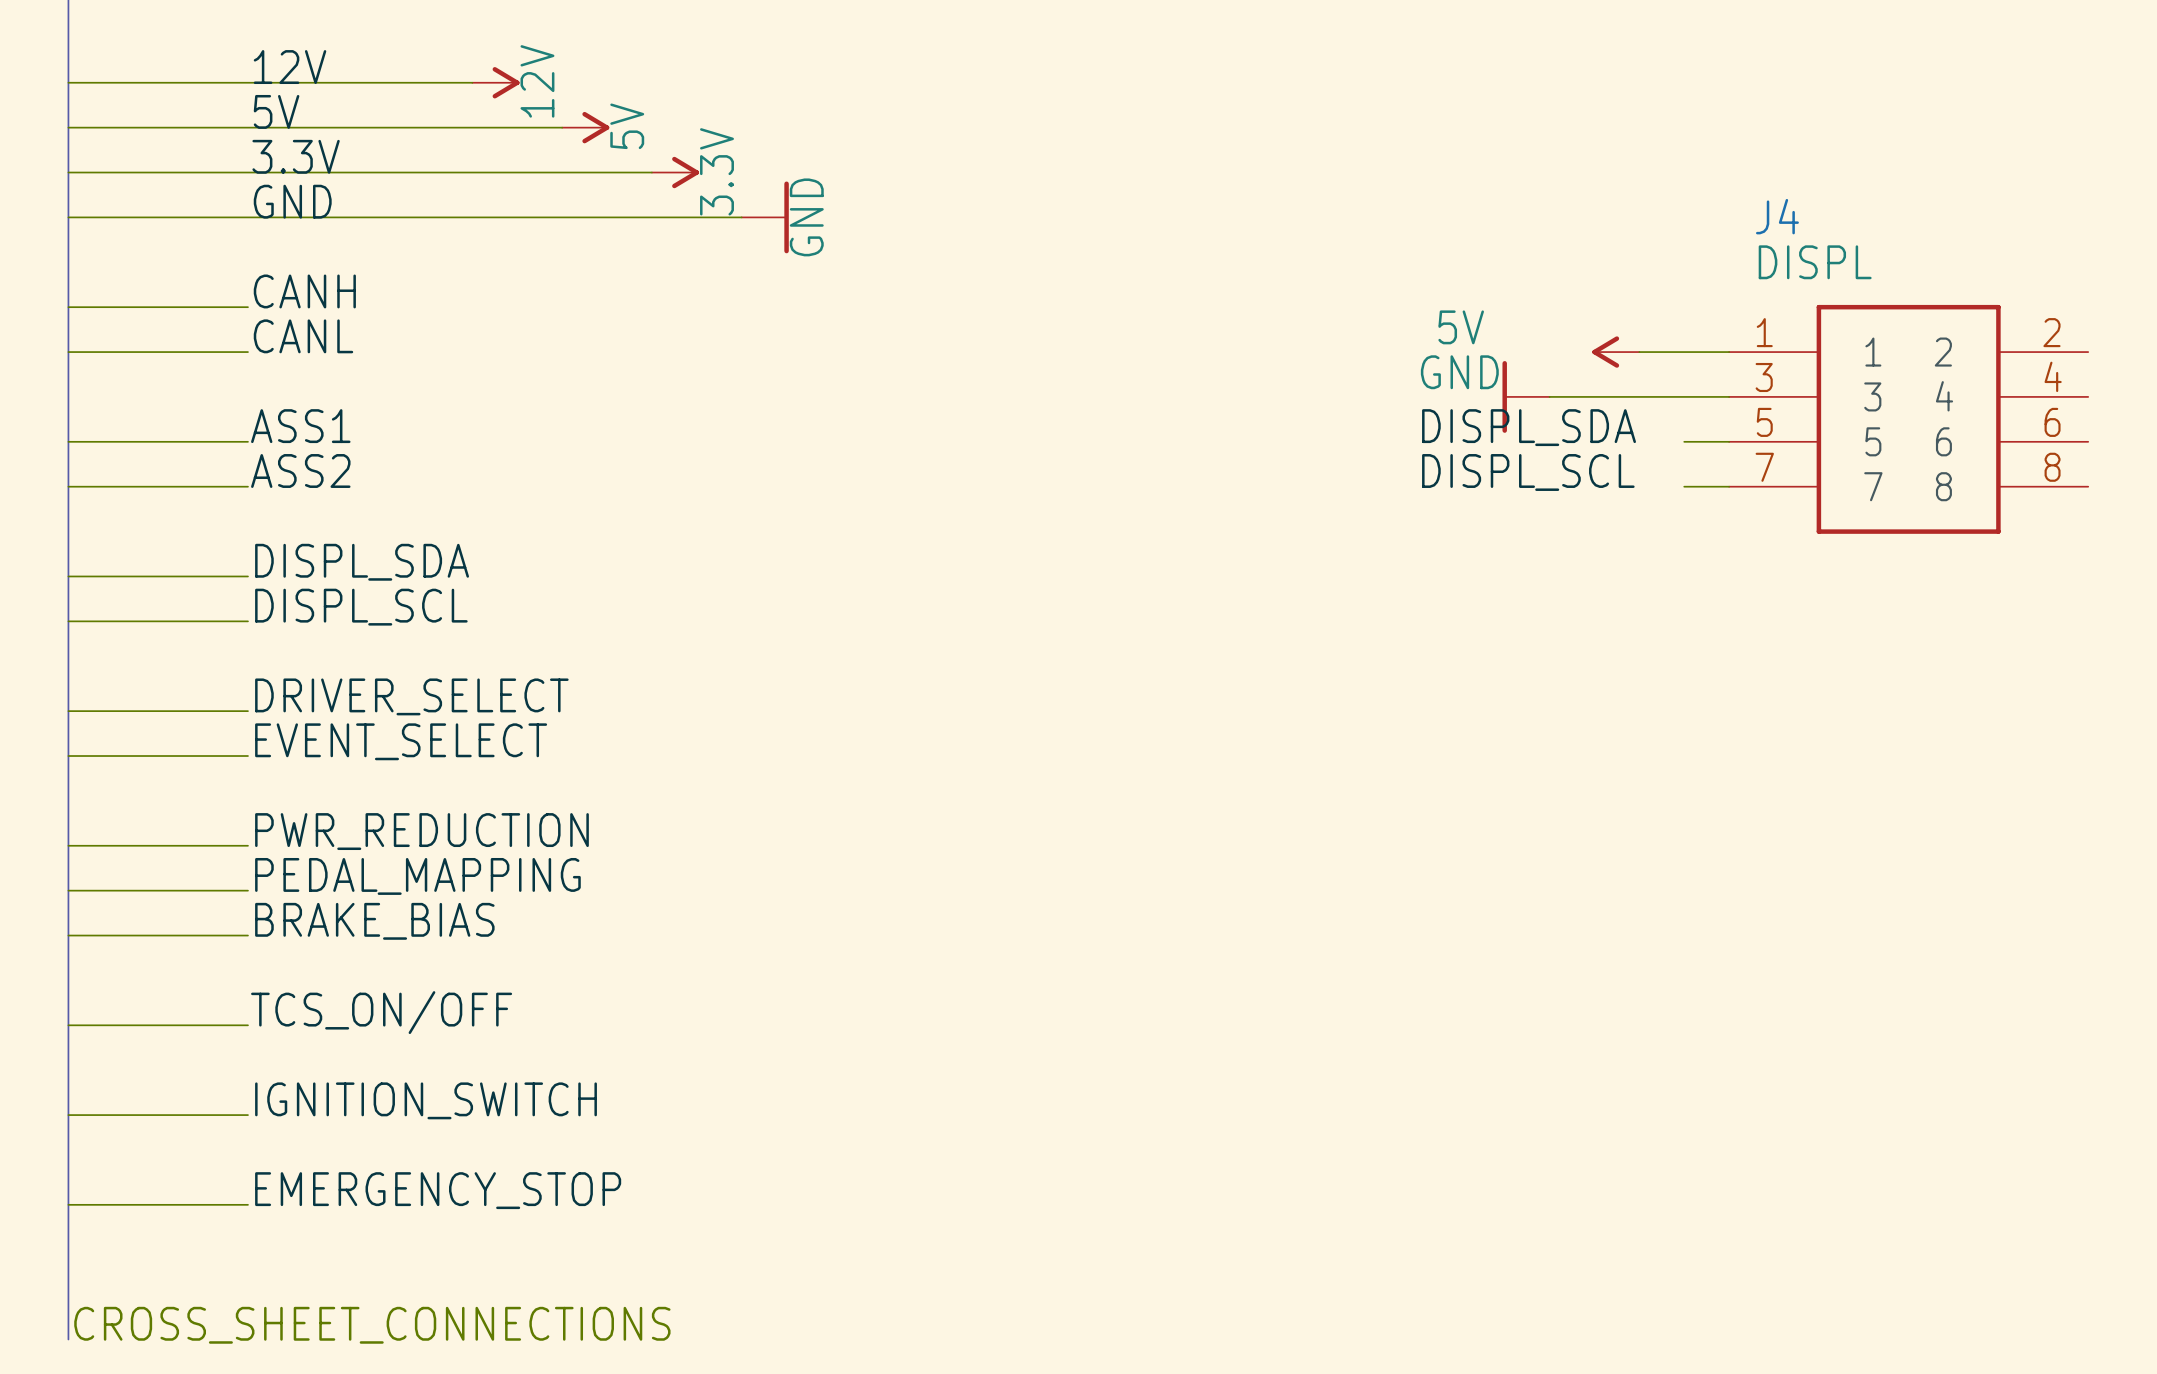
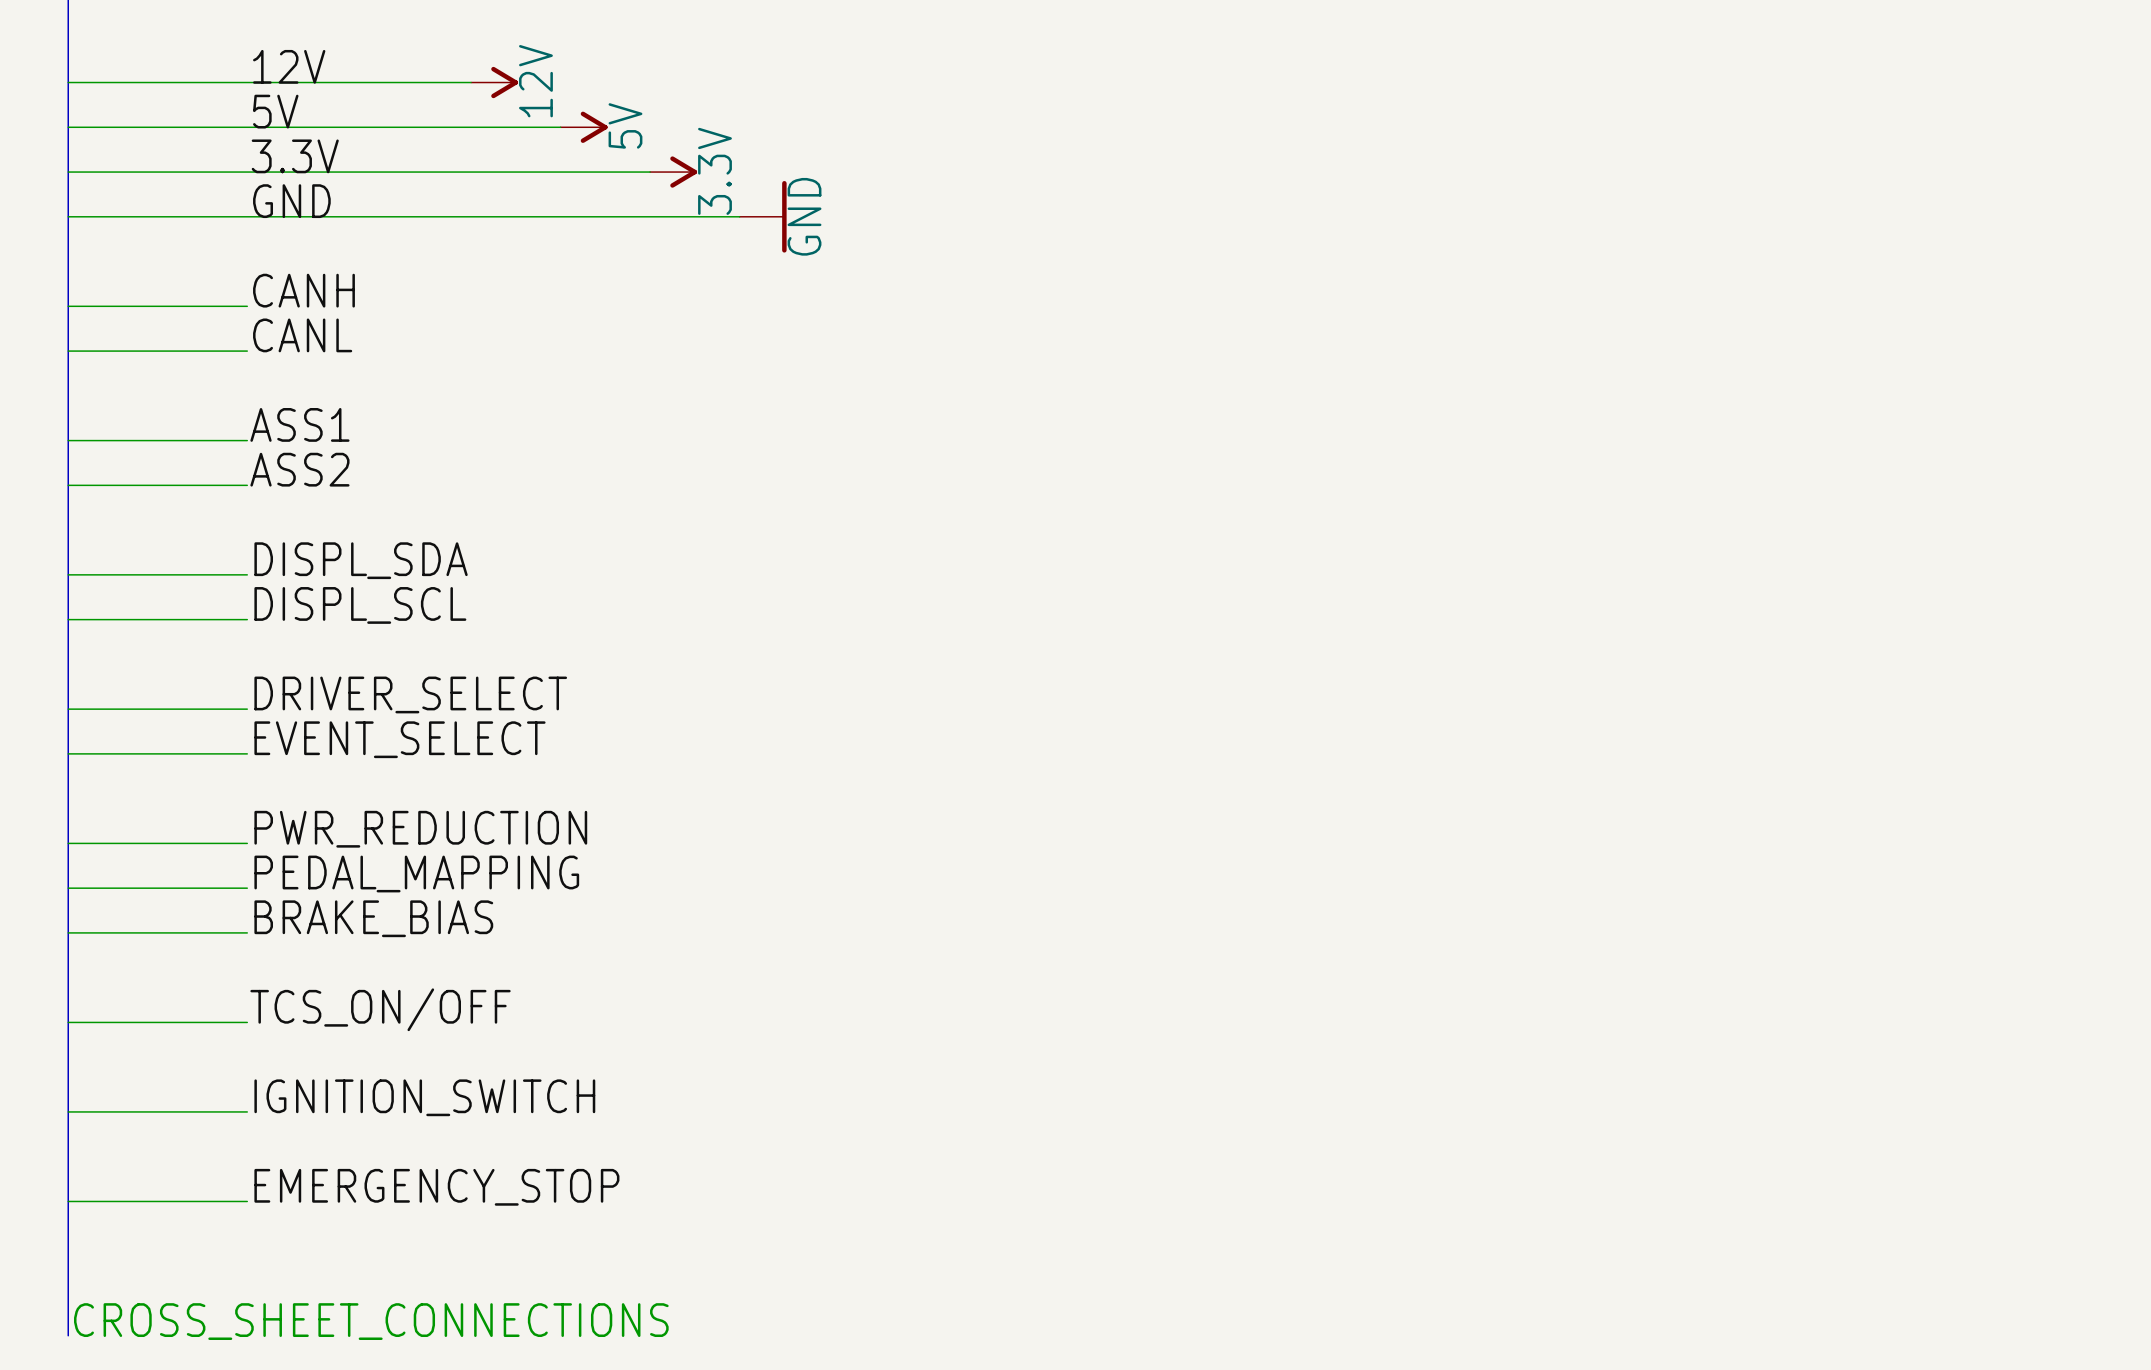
power symbol: 5V (1615, 352) -> none
wire: (1639, 352) (1729, 352) -> none
power symbol: GND (1526, 396) -> none
wire: (1549, 396) (1729, 396) -> none
J4: DISPL (1908, 419) -> none
label: DISPL_SDA (1529, 427) -> none
wire: (1684, 441) (1729, 441) -> none
label: DISPL_SCL (1528, 472) -> none
wire: (1684, 486) (1729, 486) -> none

